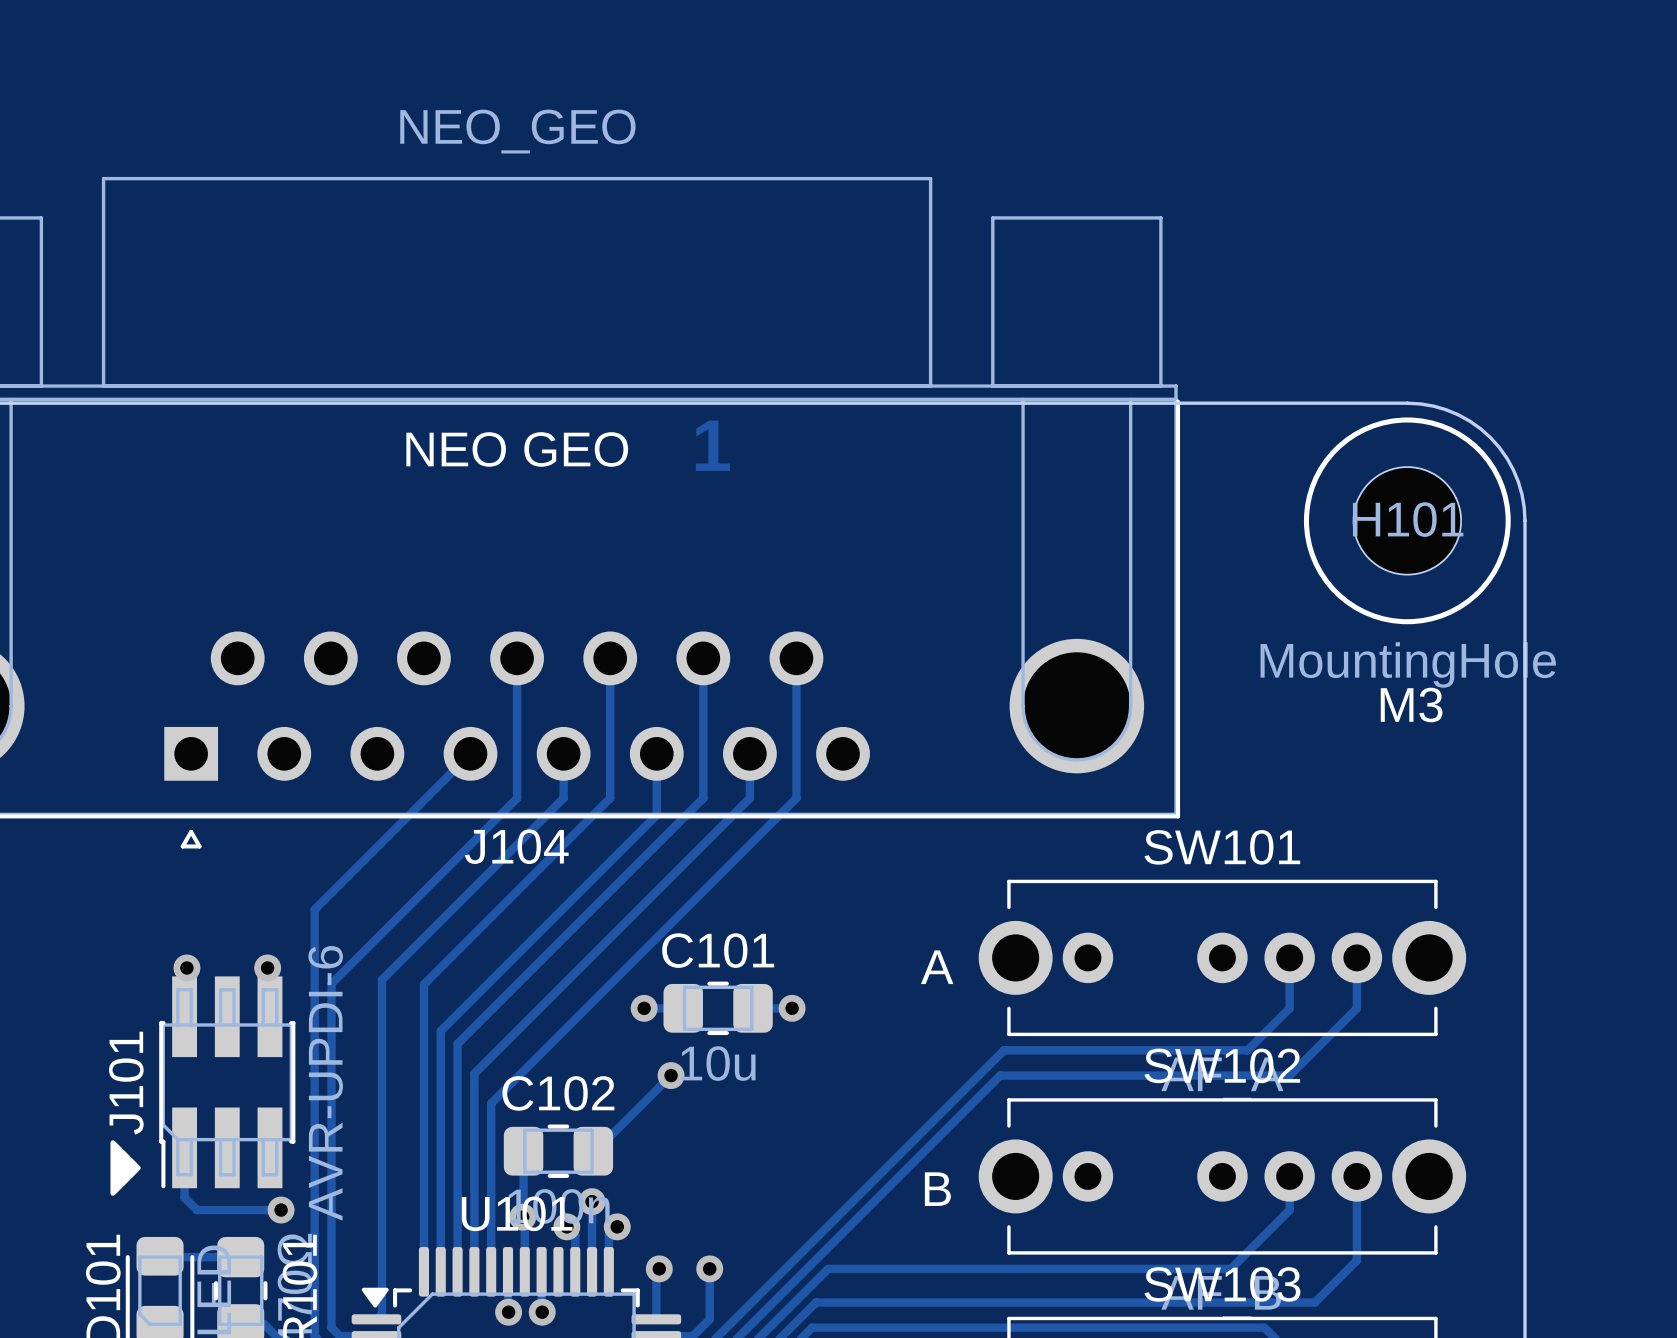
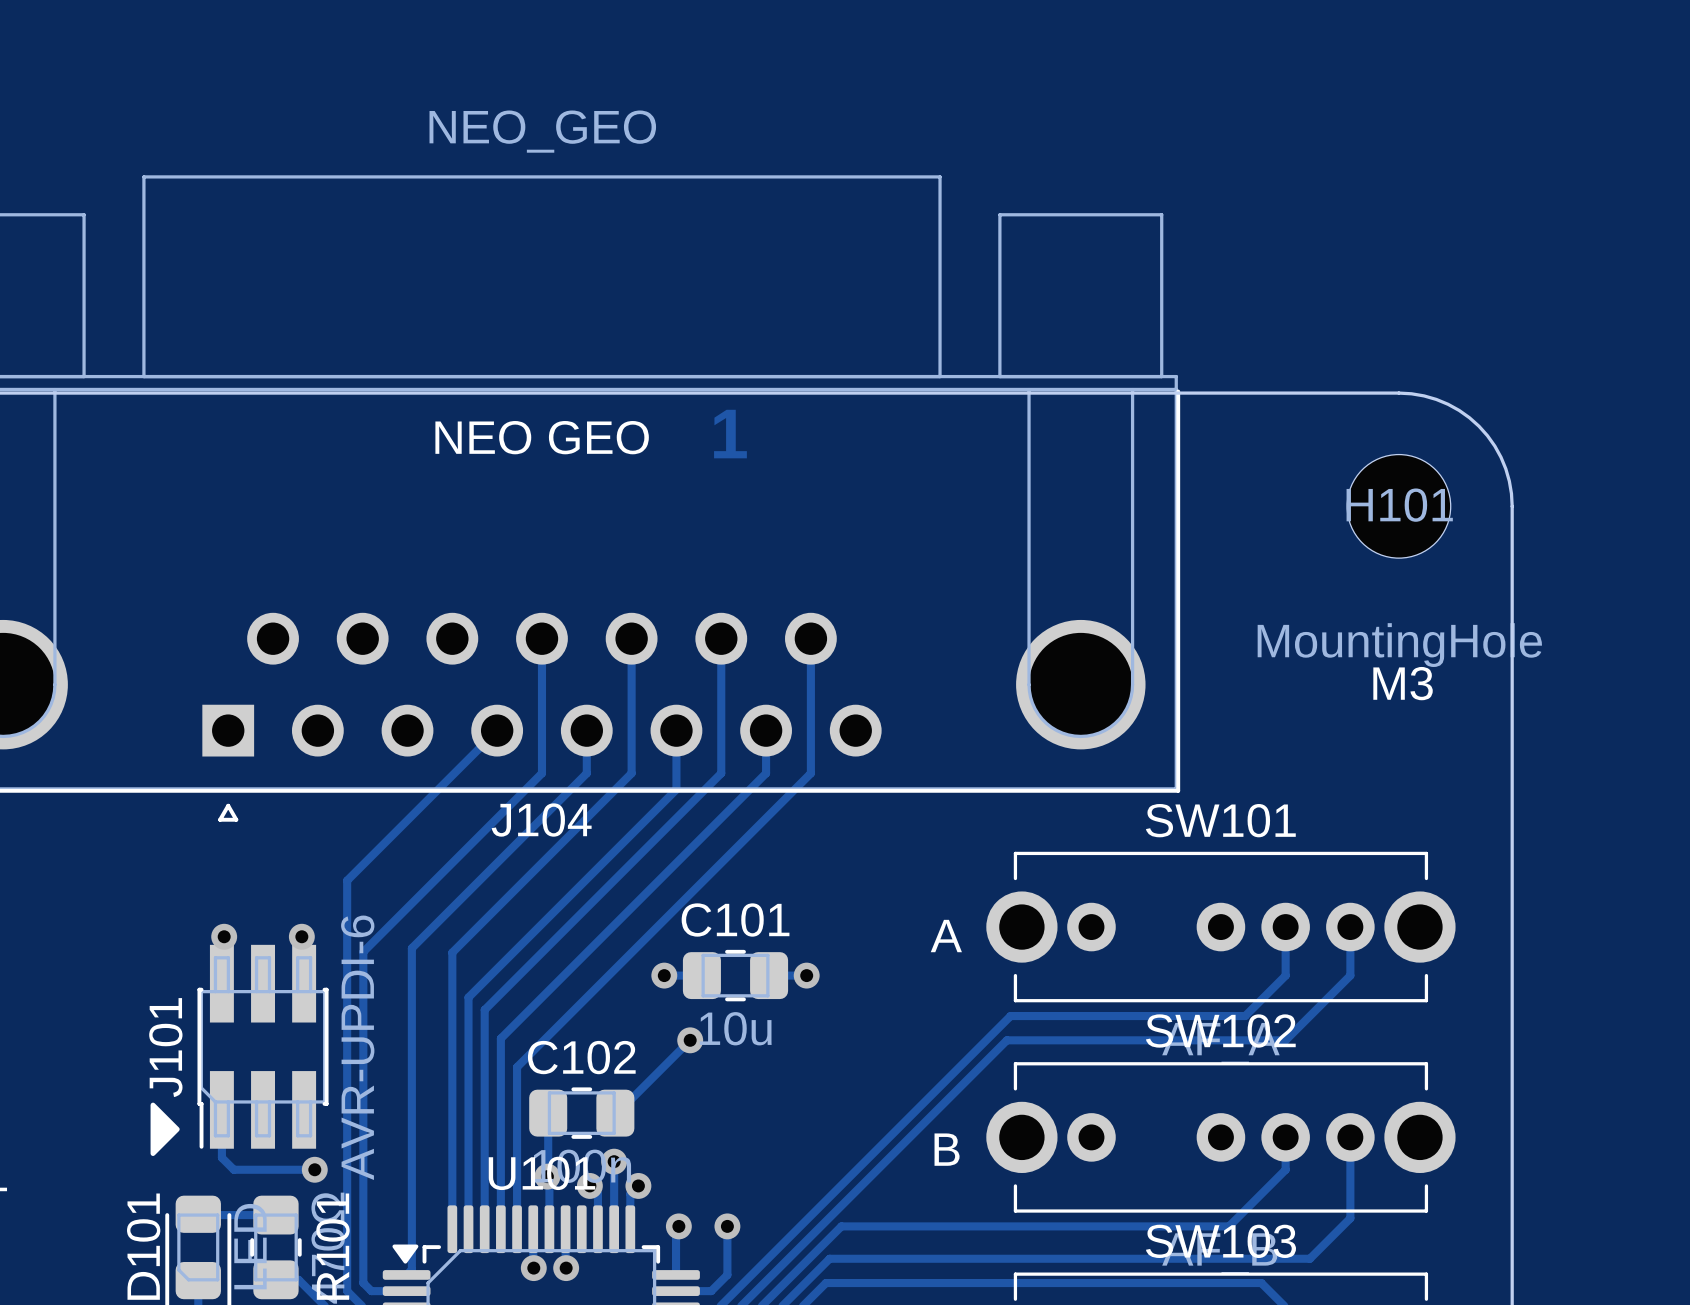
drawing: [1303, 417, 1511, 625] -> none

